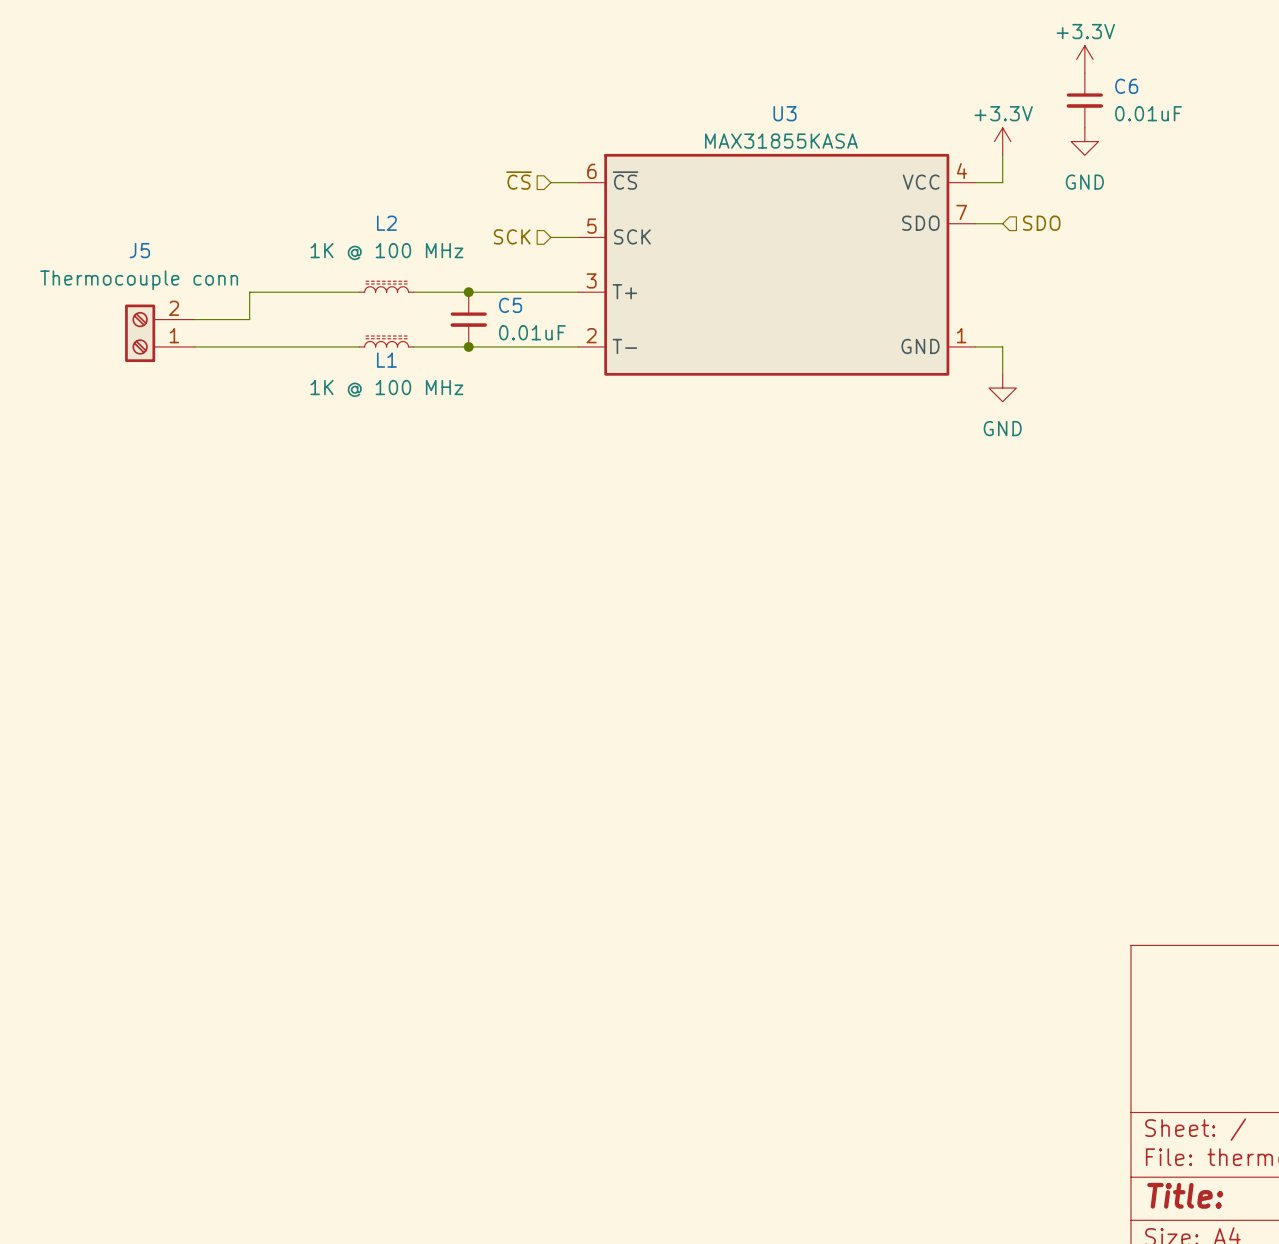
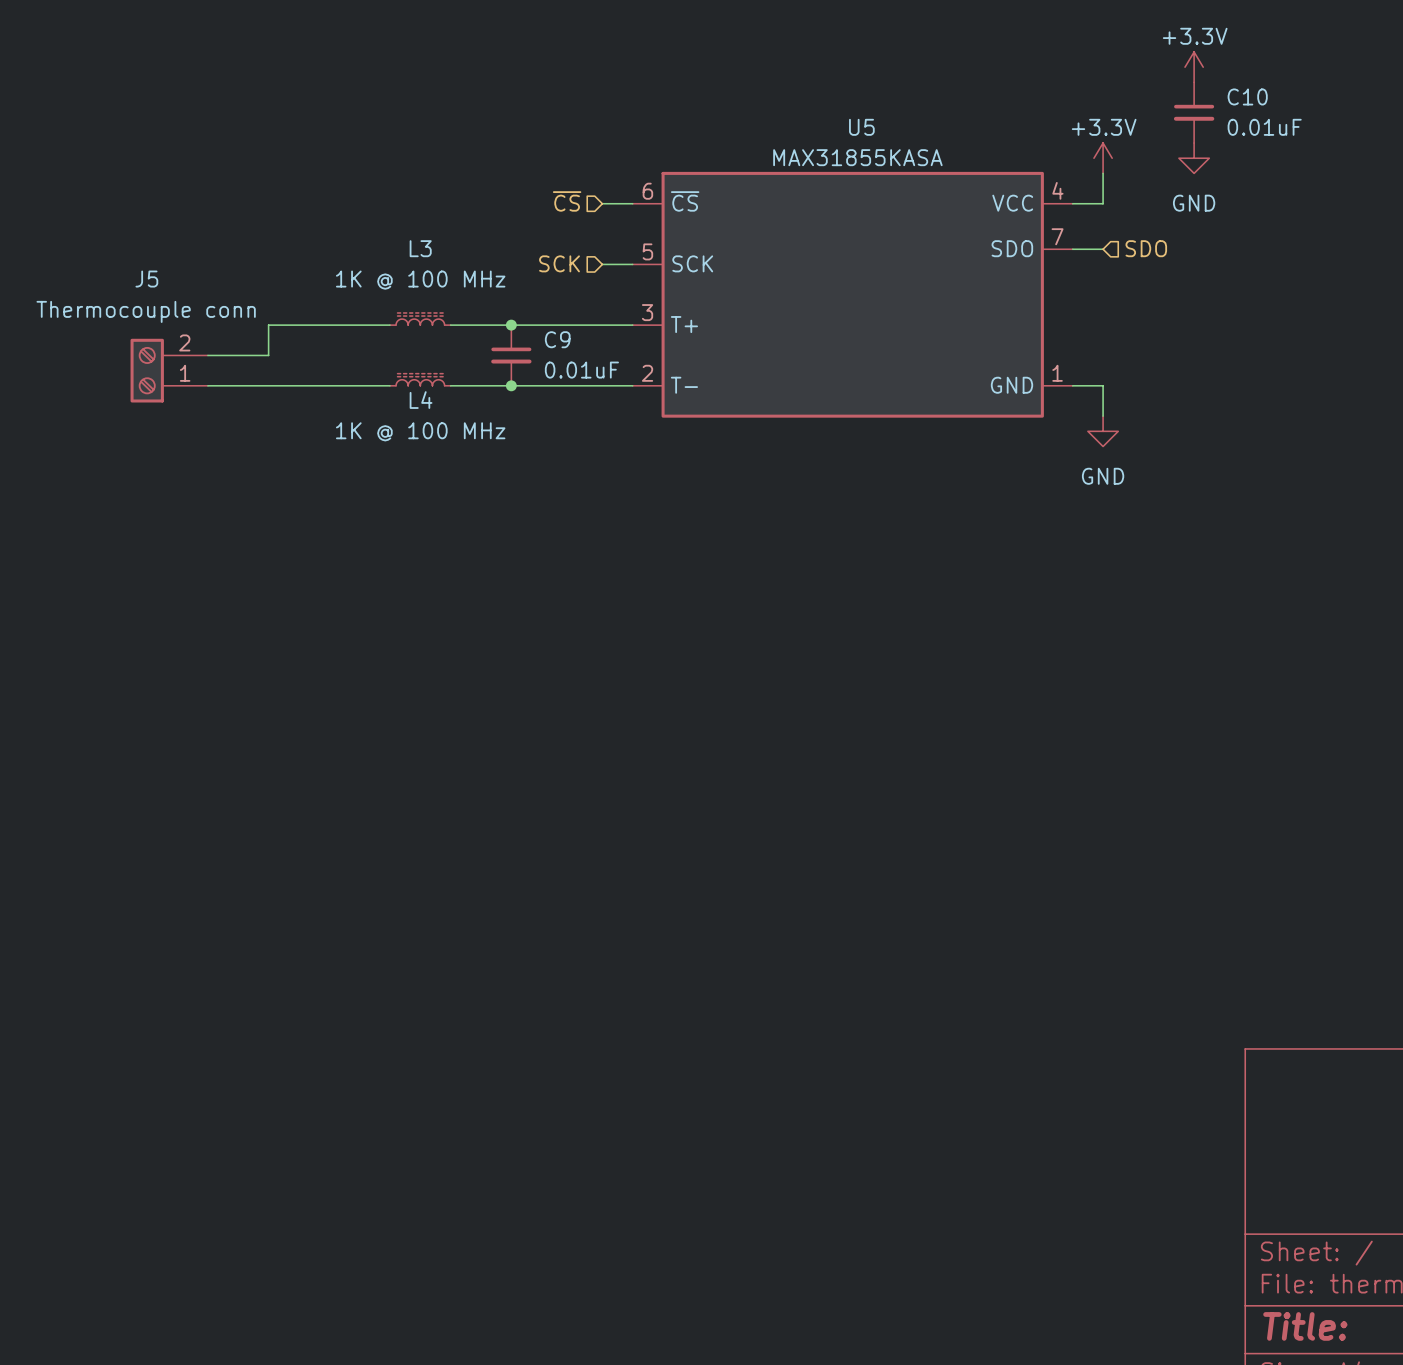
C6 name: C6 (1126, 86) -> C10 (1247, 96)
U3 name: U3 (785, 113) -> U5 (861, 127)
L2 name: L2 (386, 223) -> L3 (420, 248)
C5 name: C5 (510, 305) -> C9 (557, 339)
L1 name: L1 (386, 360) -> L4 (421, 400)

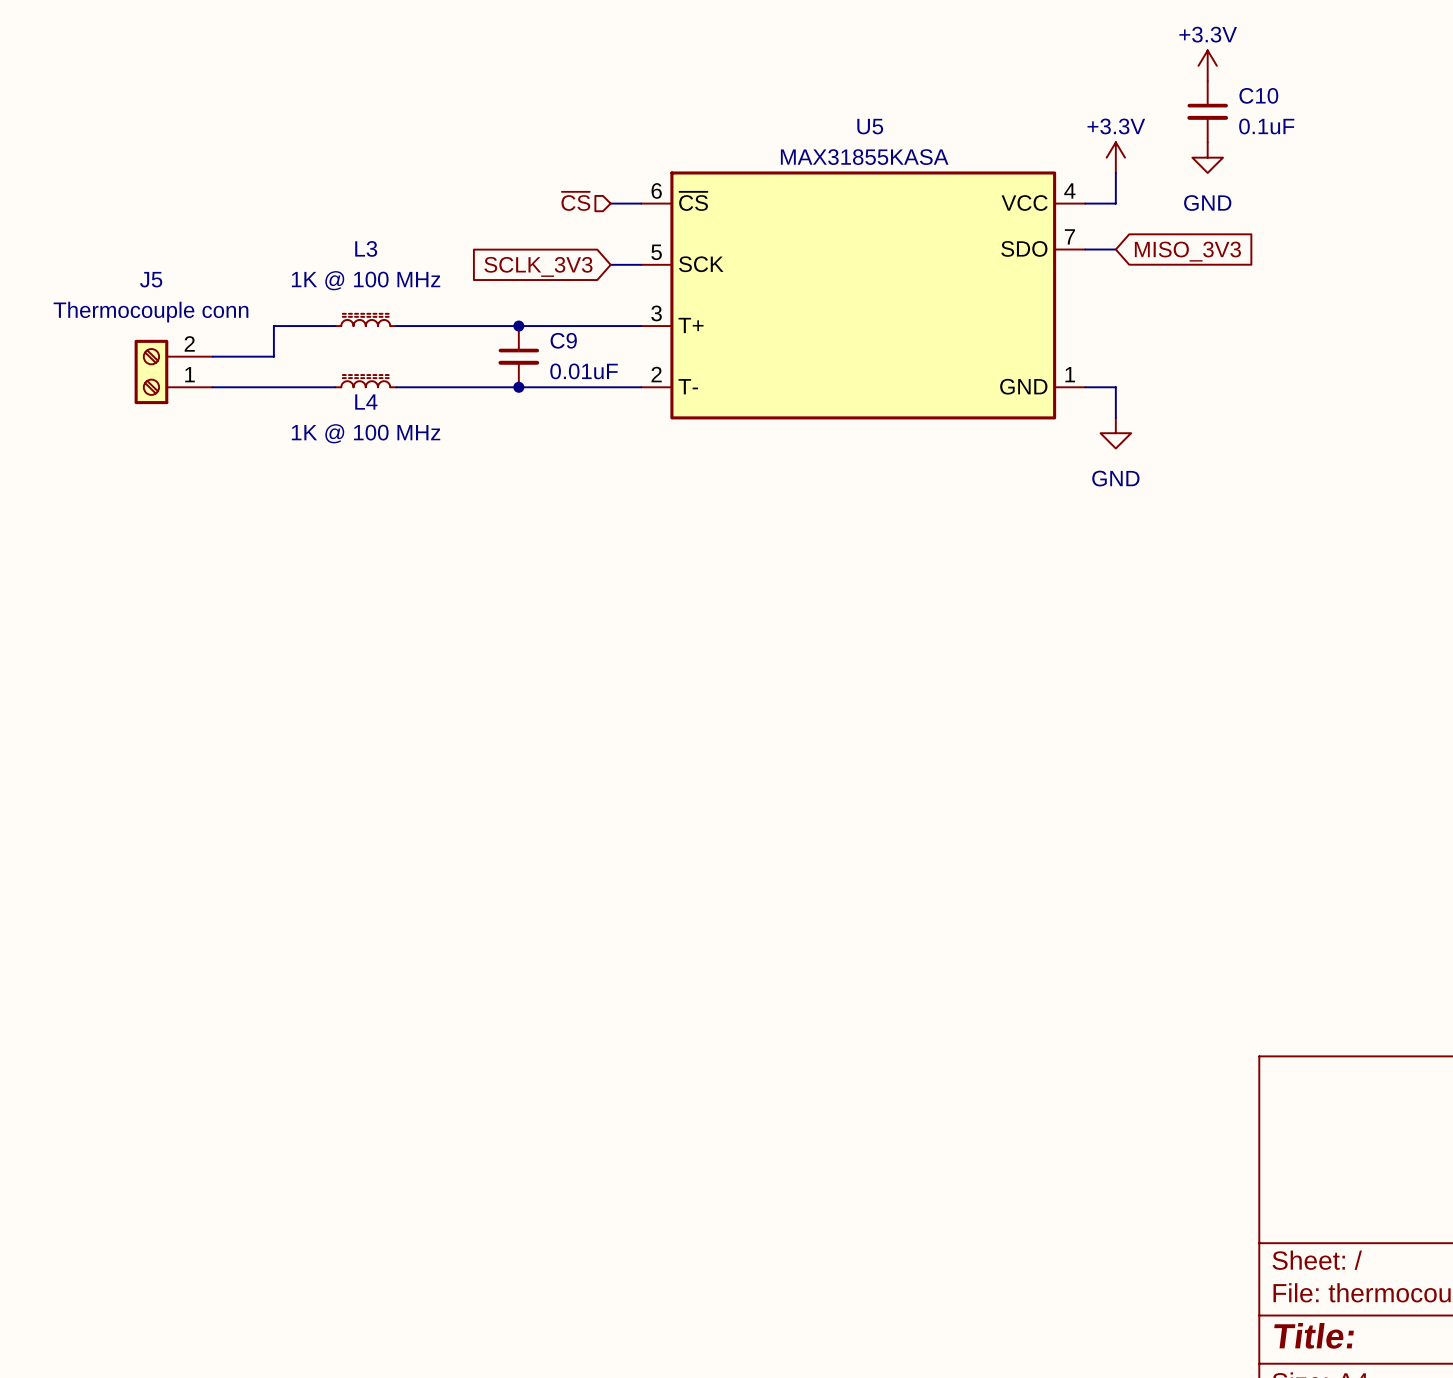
C10 value: 0.01uF (1264, 127) -> 0.1uF (1266, 126)
hierarchical label: SDO (1146, 248) -> none
global label: none -> MISO_3V3 (1187, 251)
hierarchical label: SCK (559, 263) -> none
global label: none -> SCLK_3V3 (538, 266)
L3 position: (420, 319) -> (365, 319)
wire: (329, 325) (389, 325) -> (457, 326) (396, 326)
L4 position: (420, 379) -> (365, 381)
wire: (329, 385) (389, 385) -> (457, 387) (396, 387)

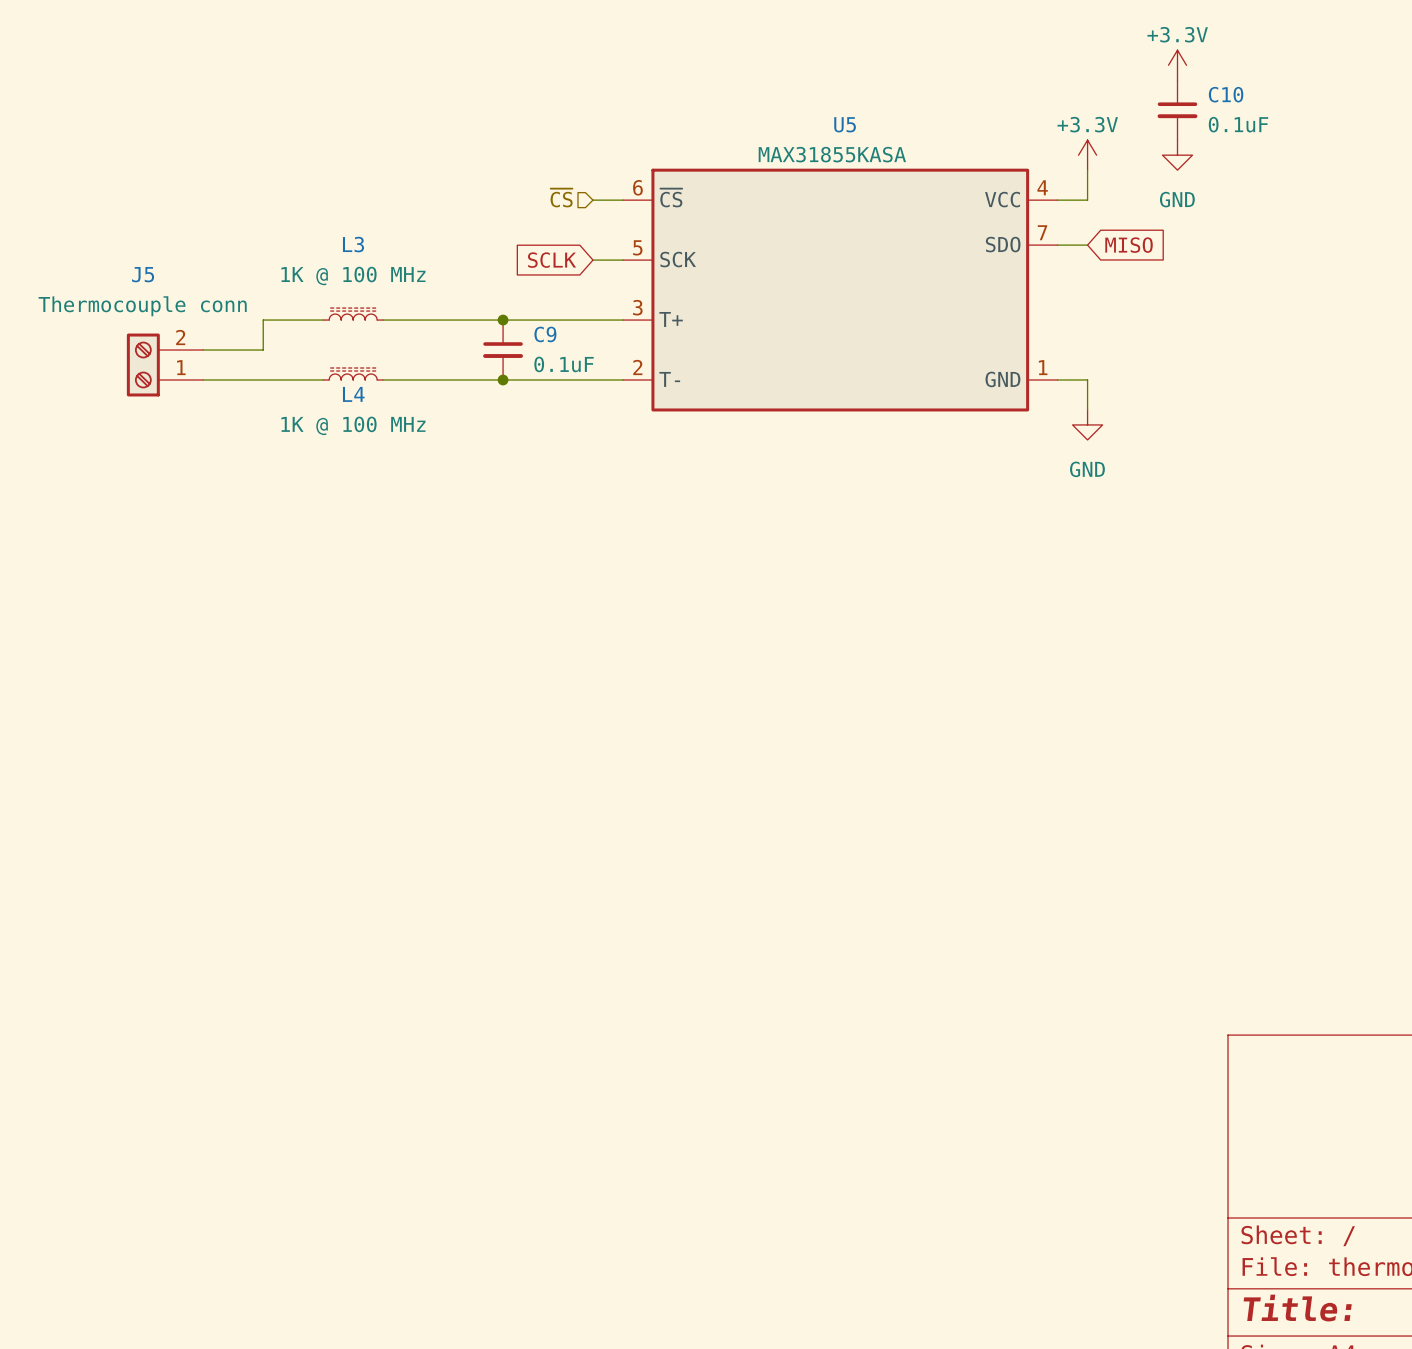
global label: MISO_3V3 (1187, 251) -> MISO (1129, 245)
global label: SCLK_3V3 (538, 266) -> SCLK (552, 260)
C9 value: 0.01uF (584, 371) -> 0.1uF (564, 364)

